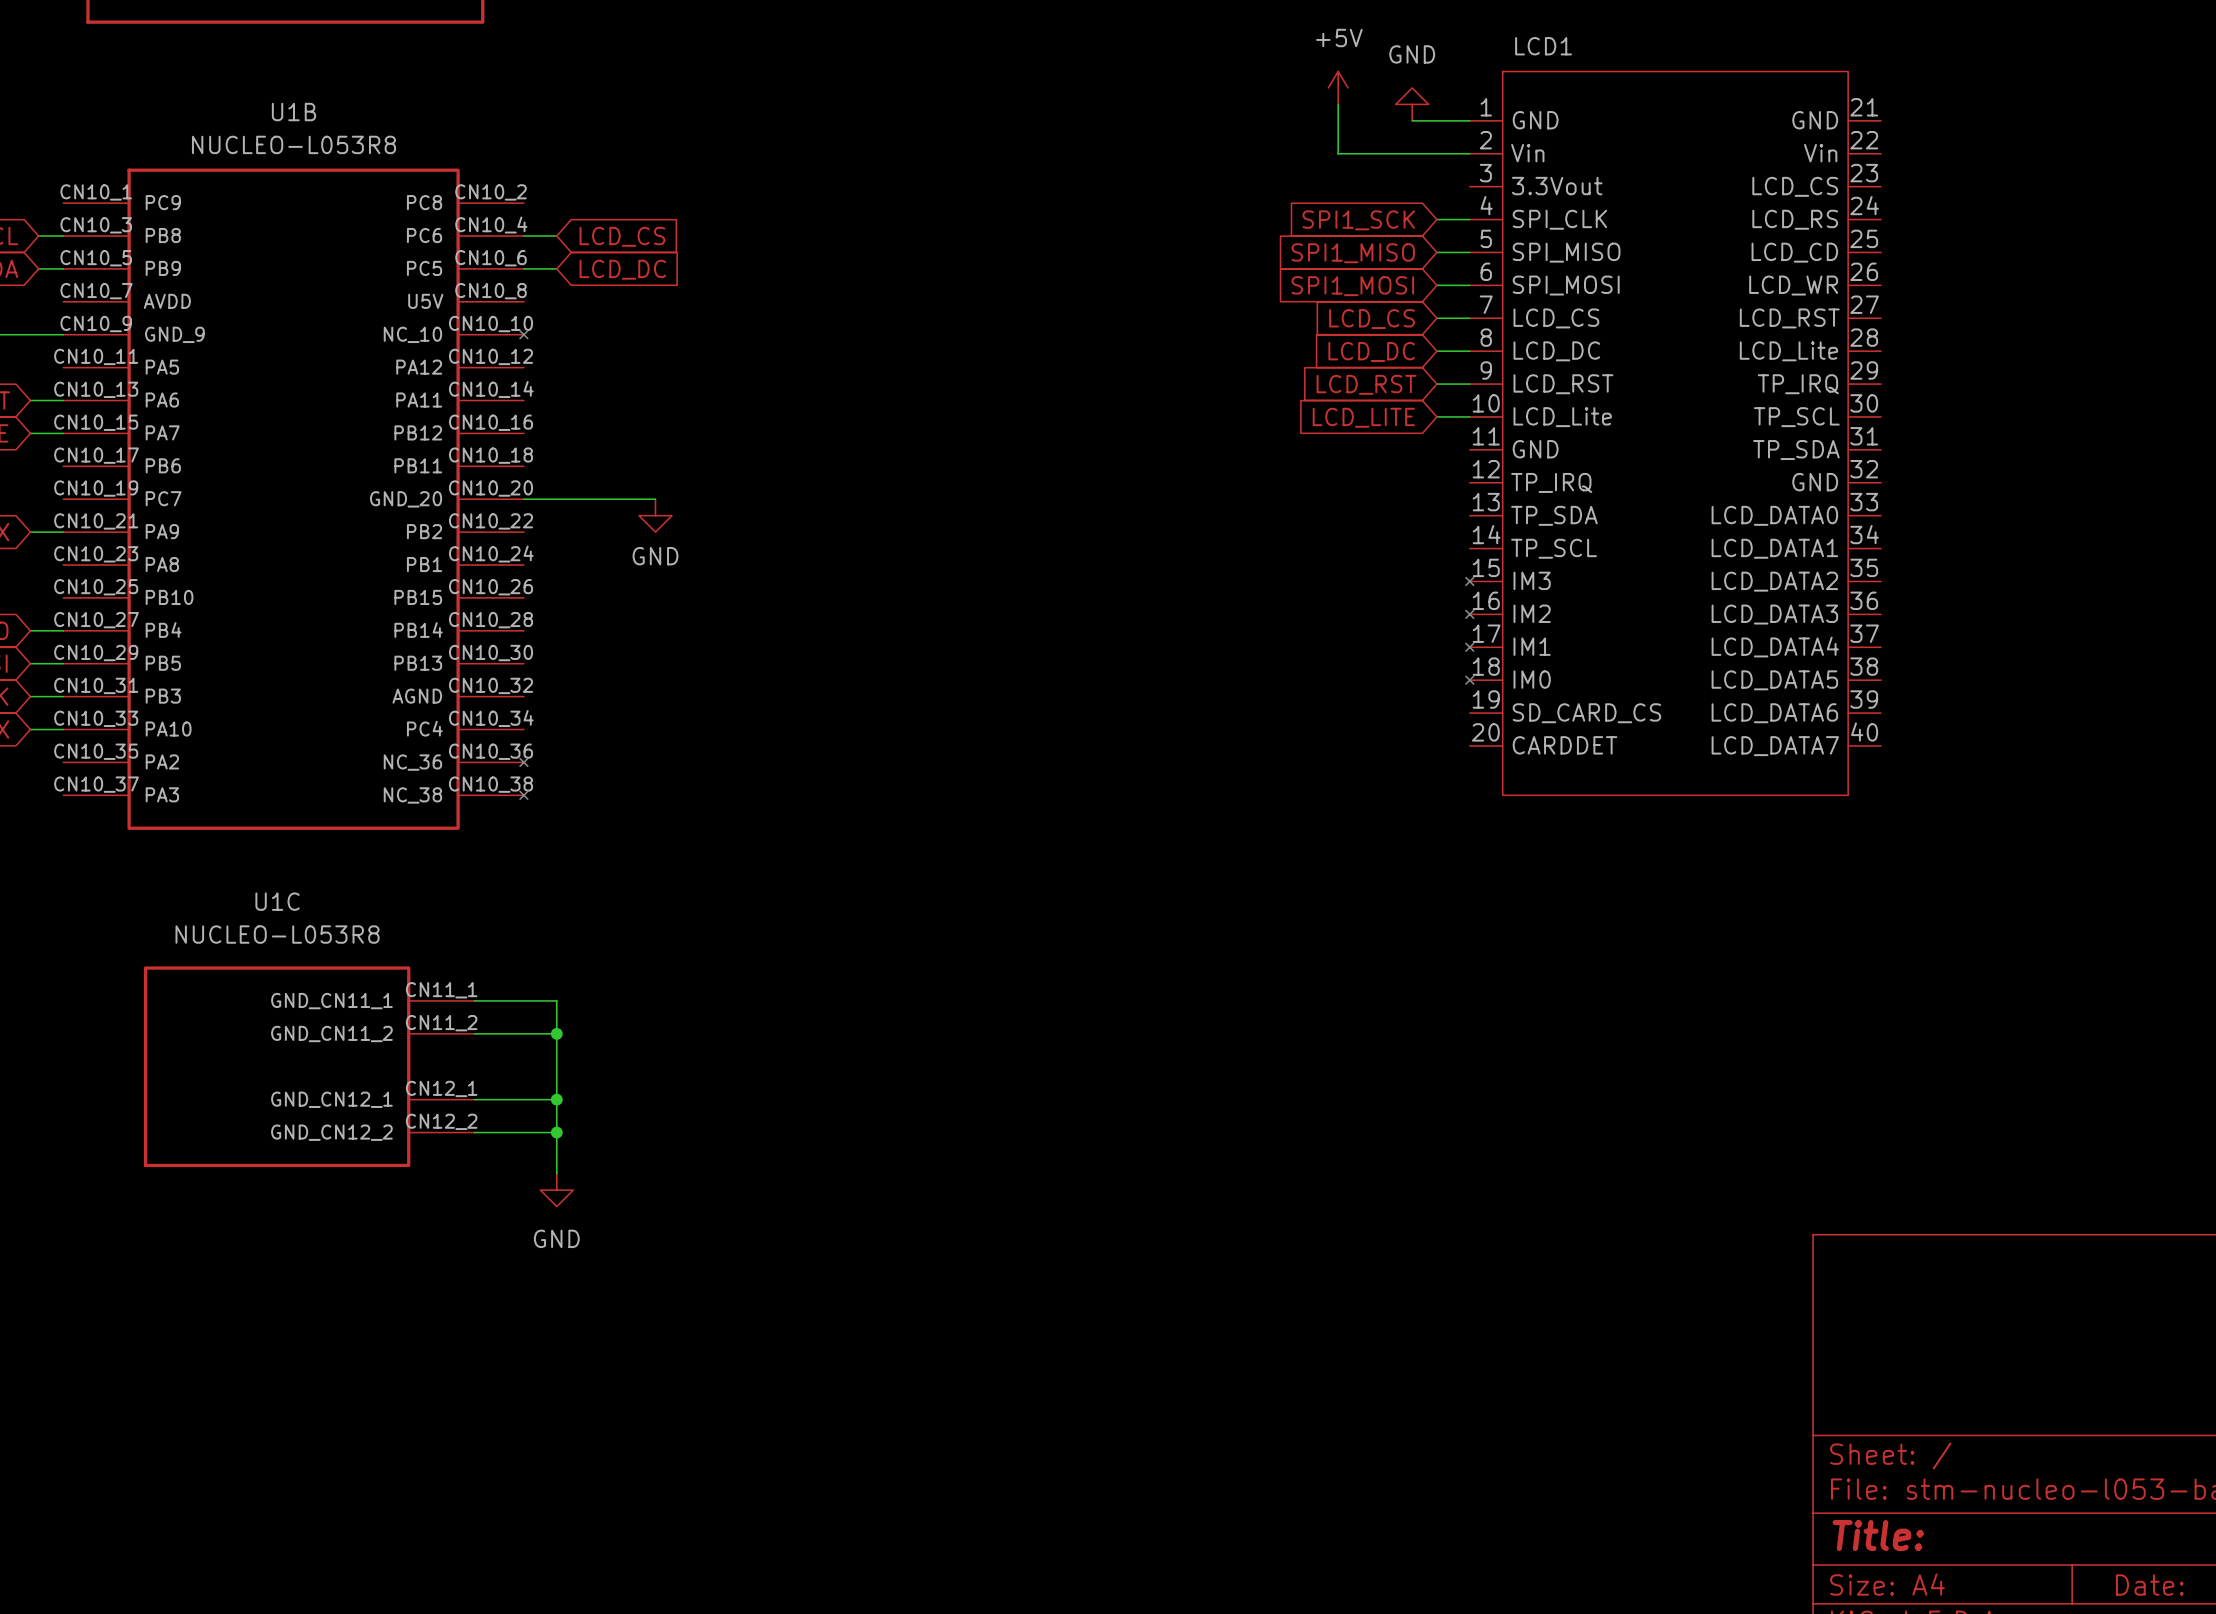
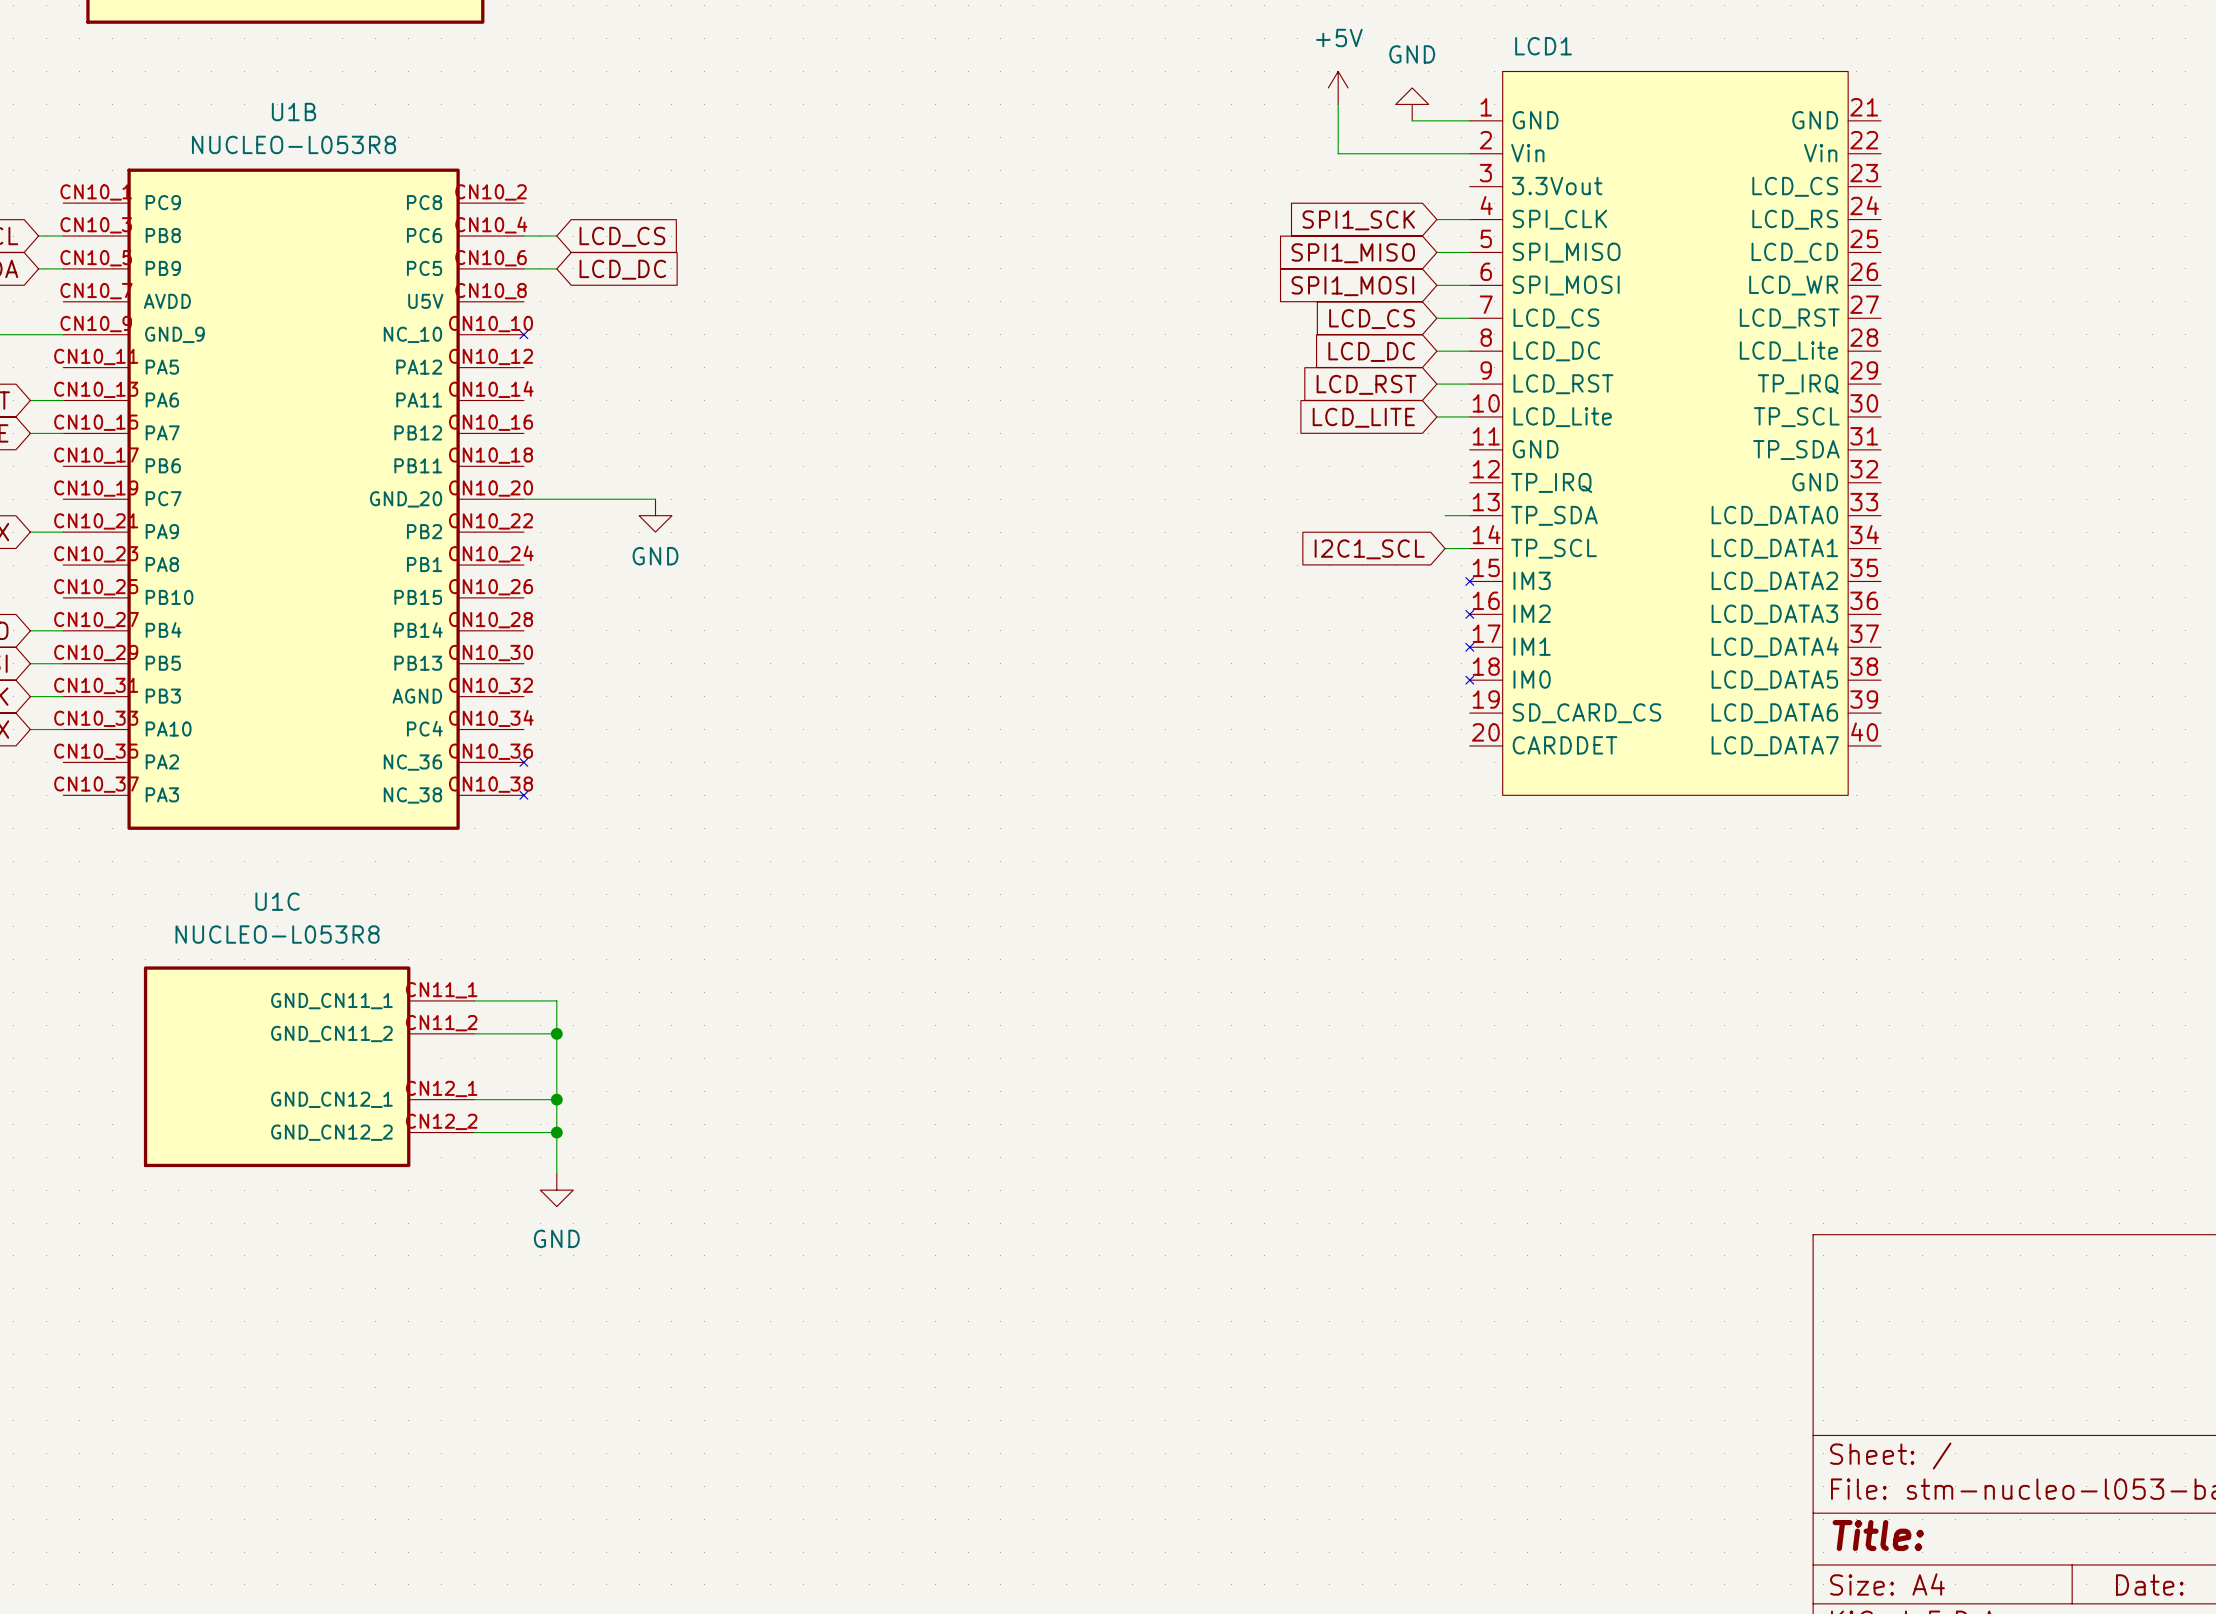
LCD1 symbol: [1465, 71, 1882, 796] -> [1465, 71, 1882, 796]
wire: none -> (1445, 515) (1469, 515)
wire: none -> (1445, 548) (1469, 548)
global label: none -> I2C1_SCL (1369, 549)

